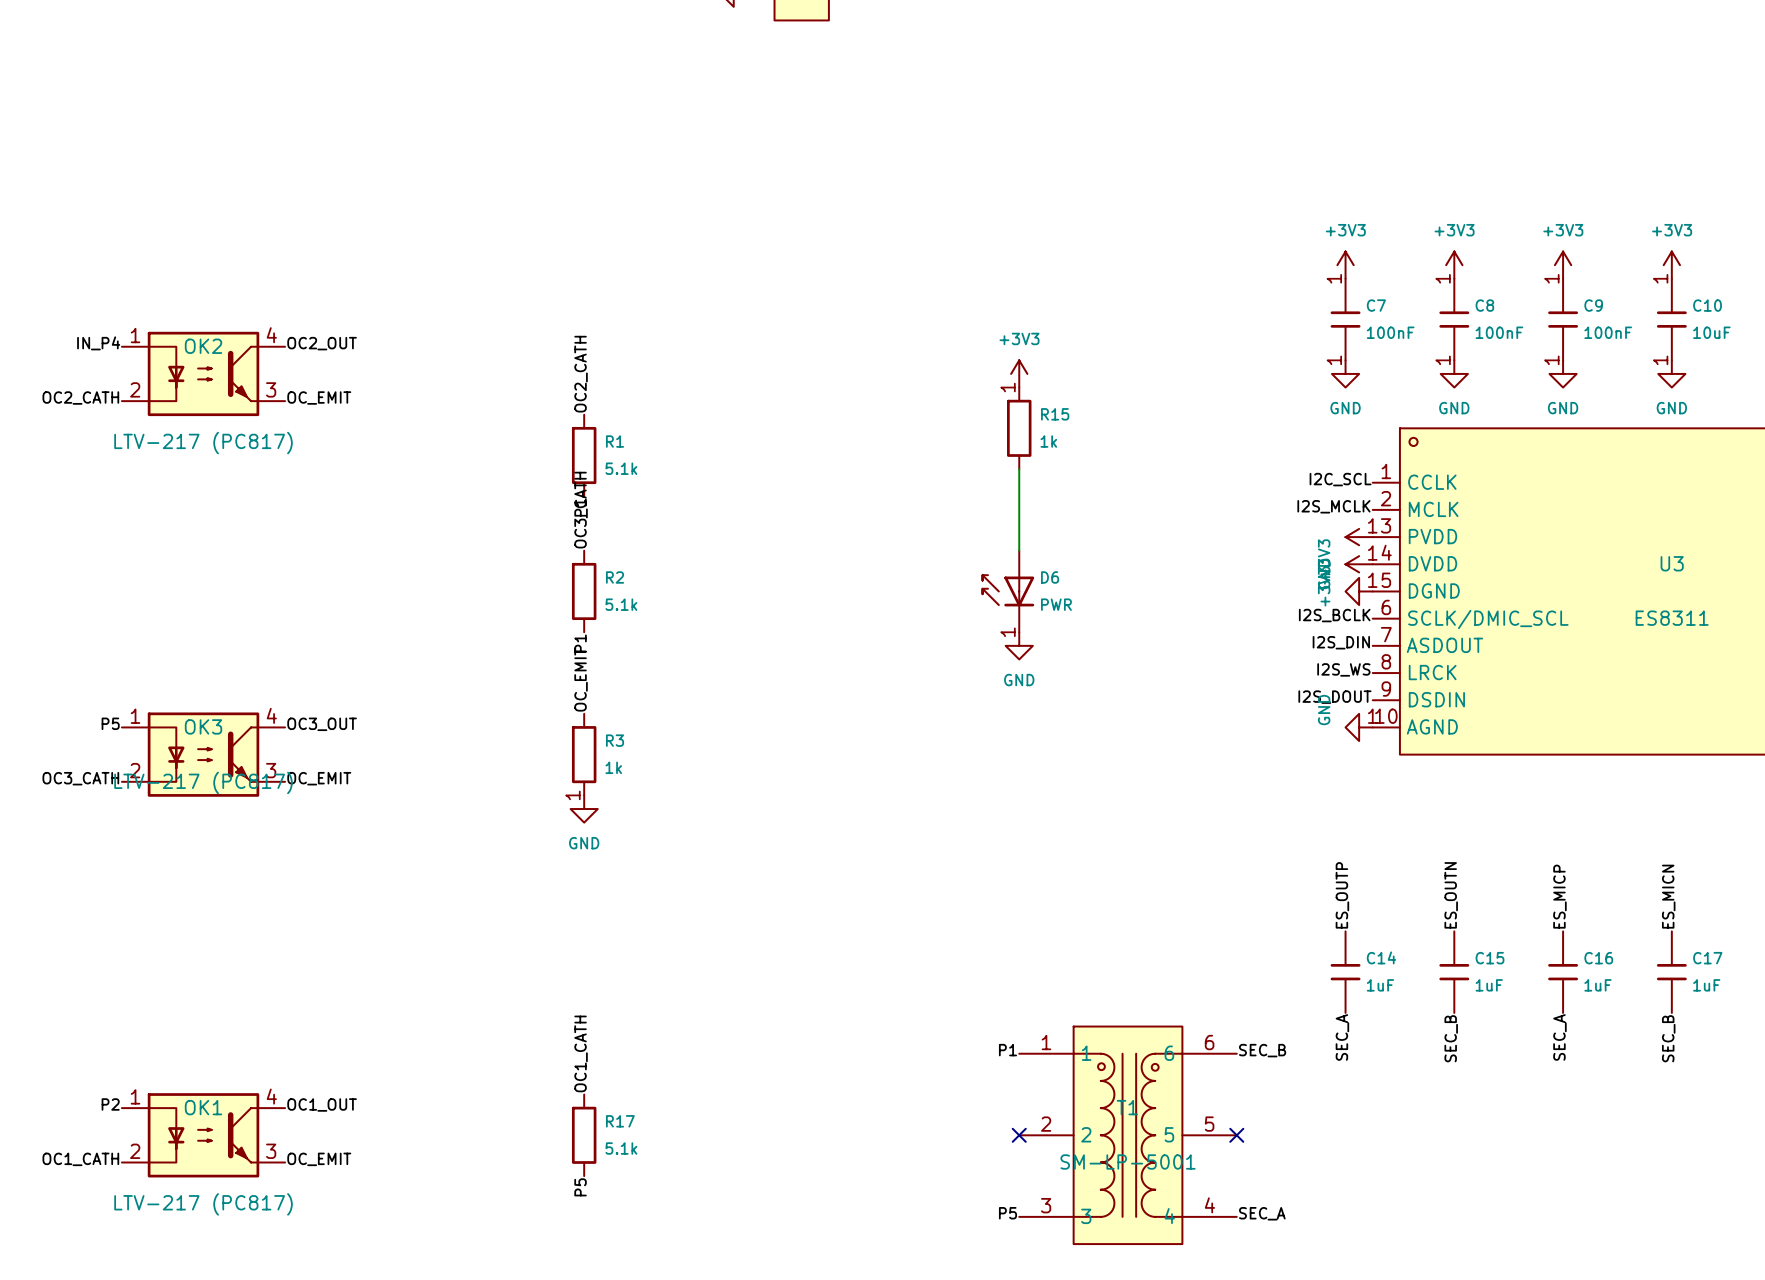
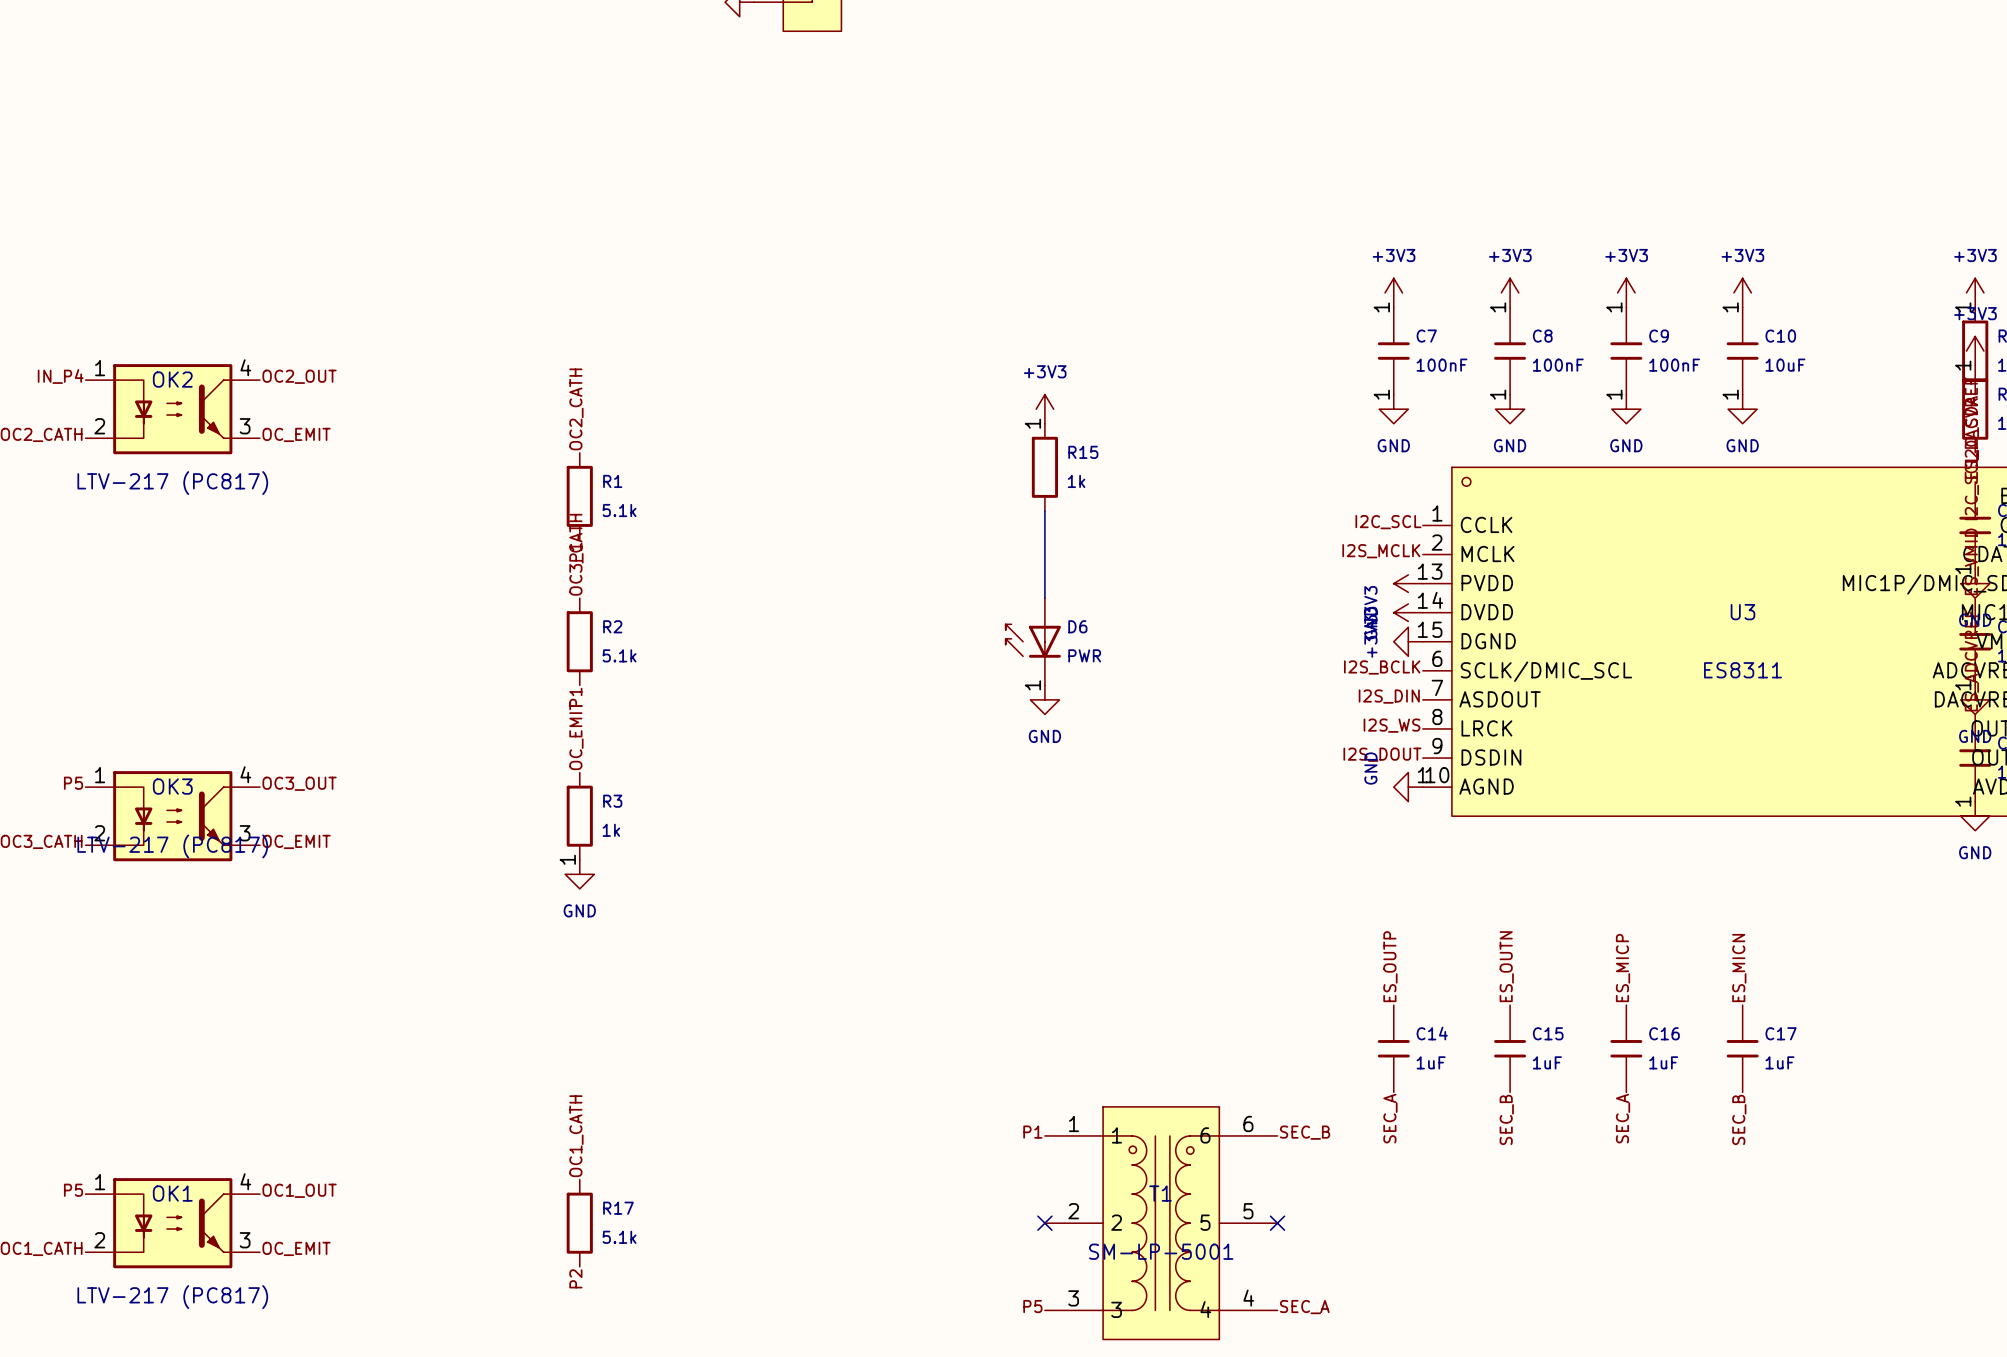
label: P2 (110, 1104) -> P5 (73, 1190)
label: P5 (580, 1187) -> P2 (575, 1278)

